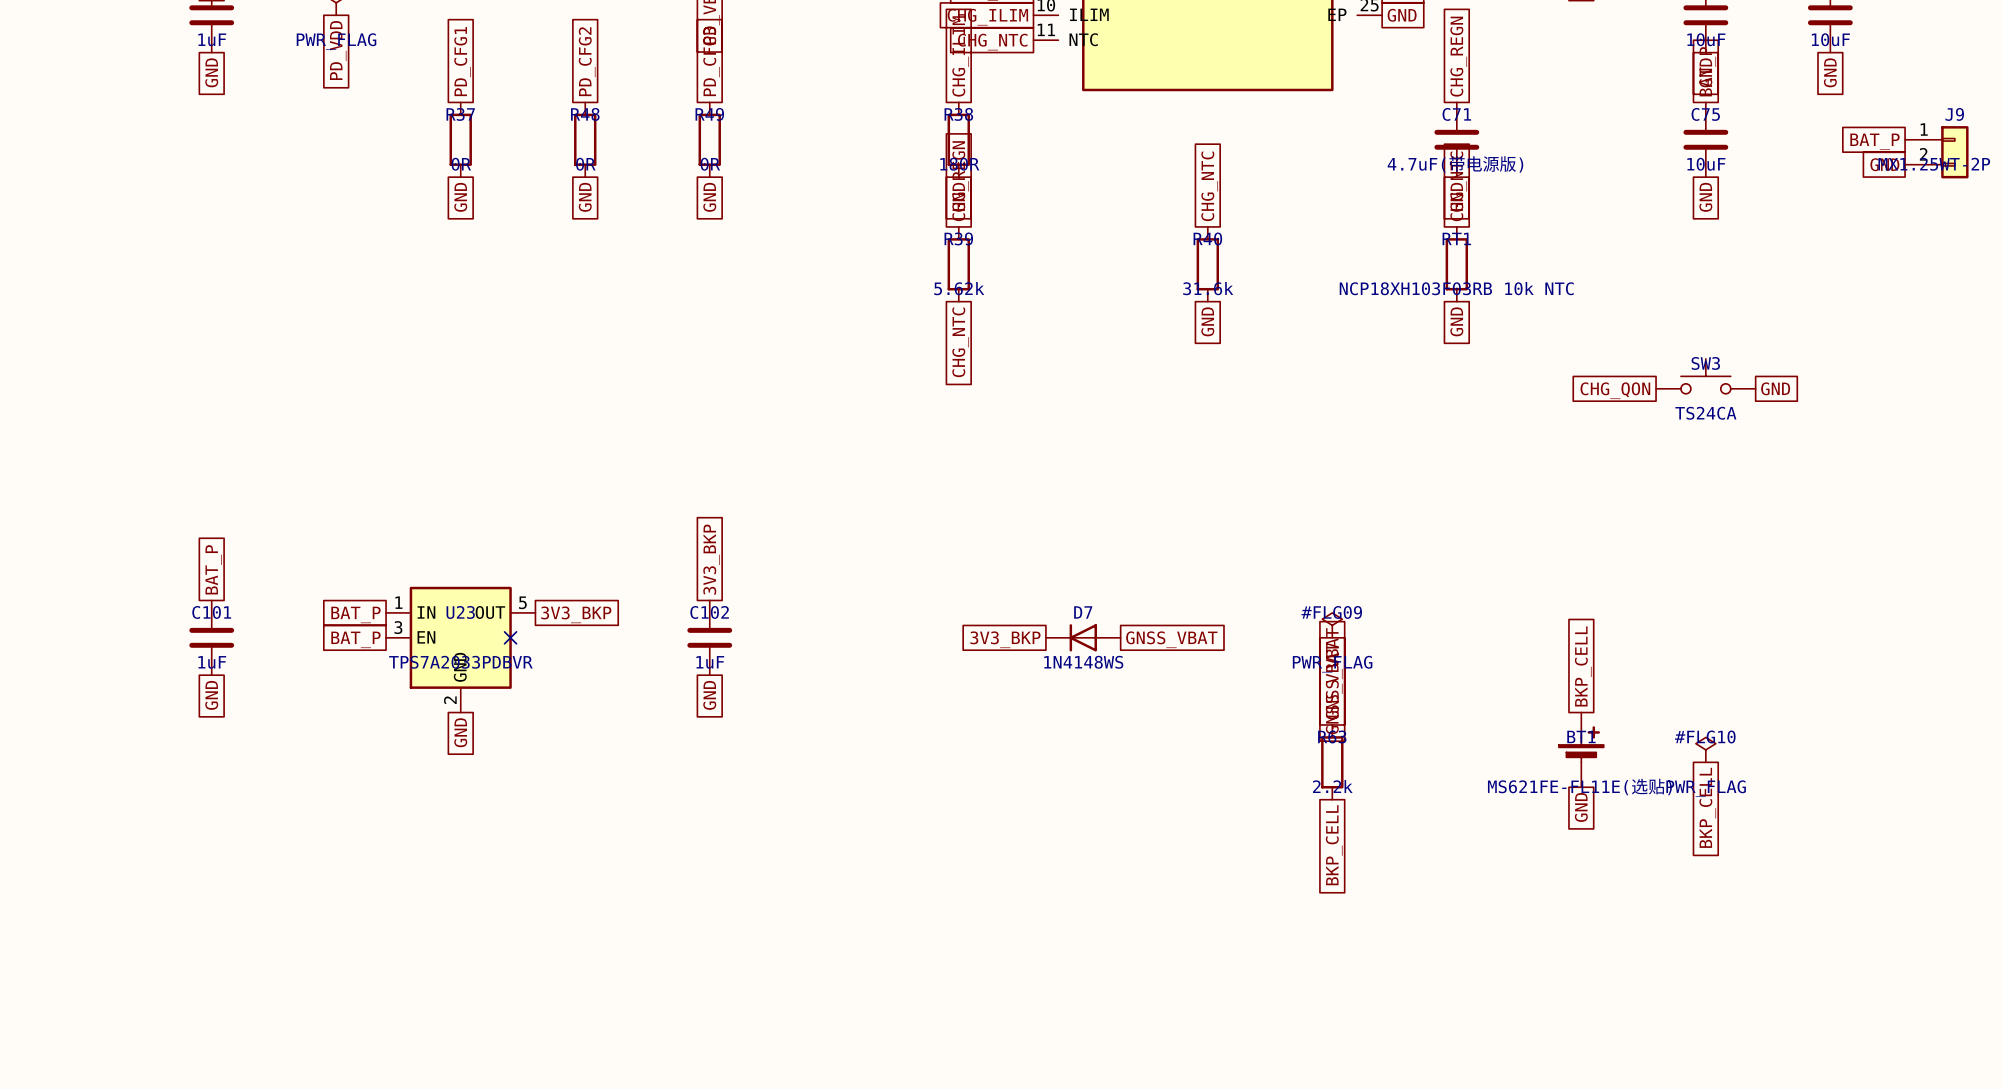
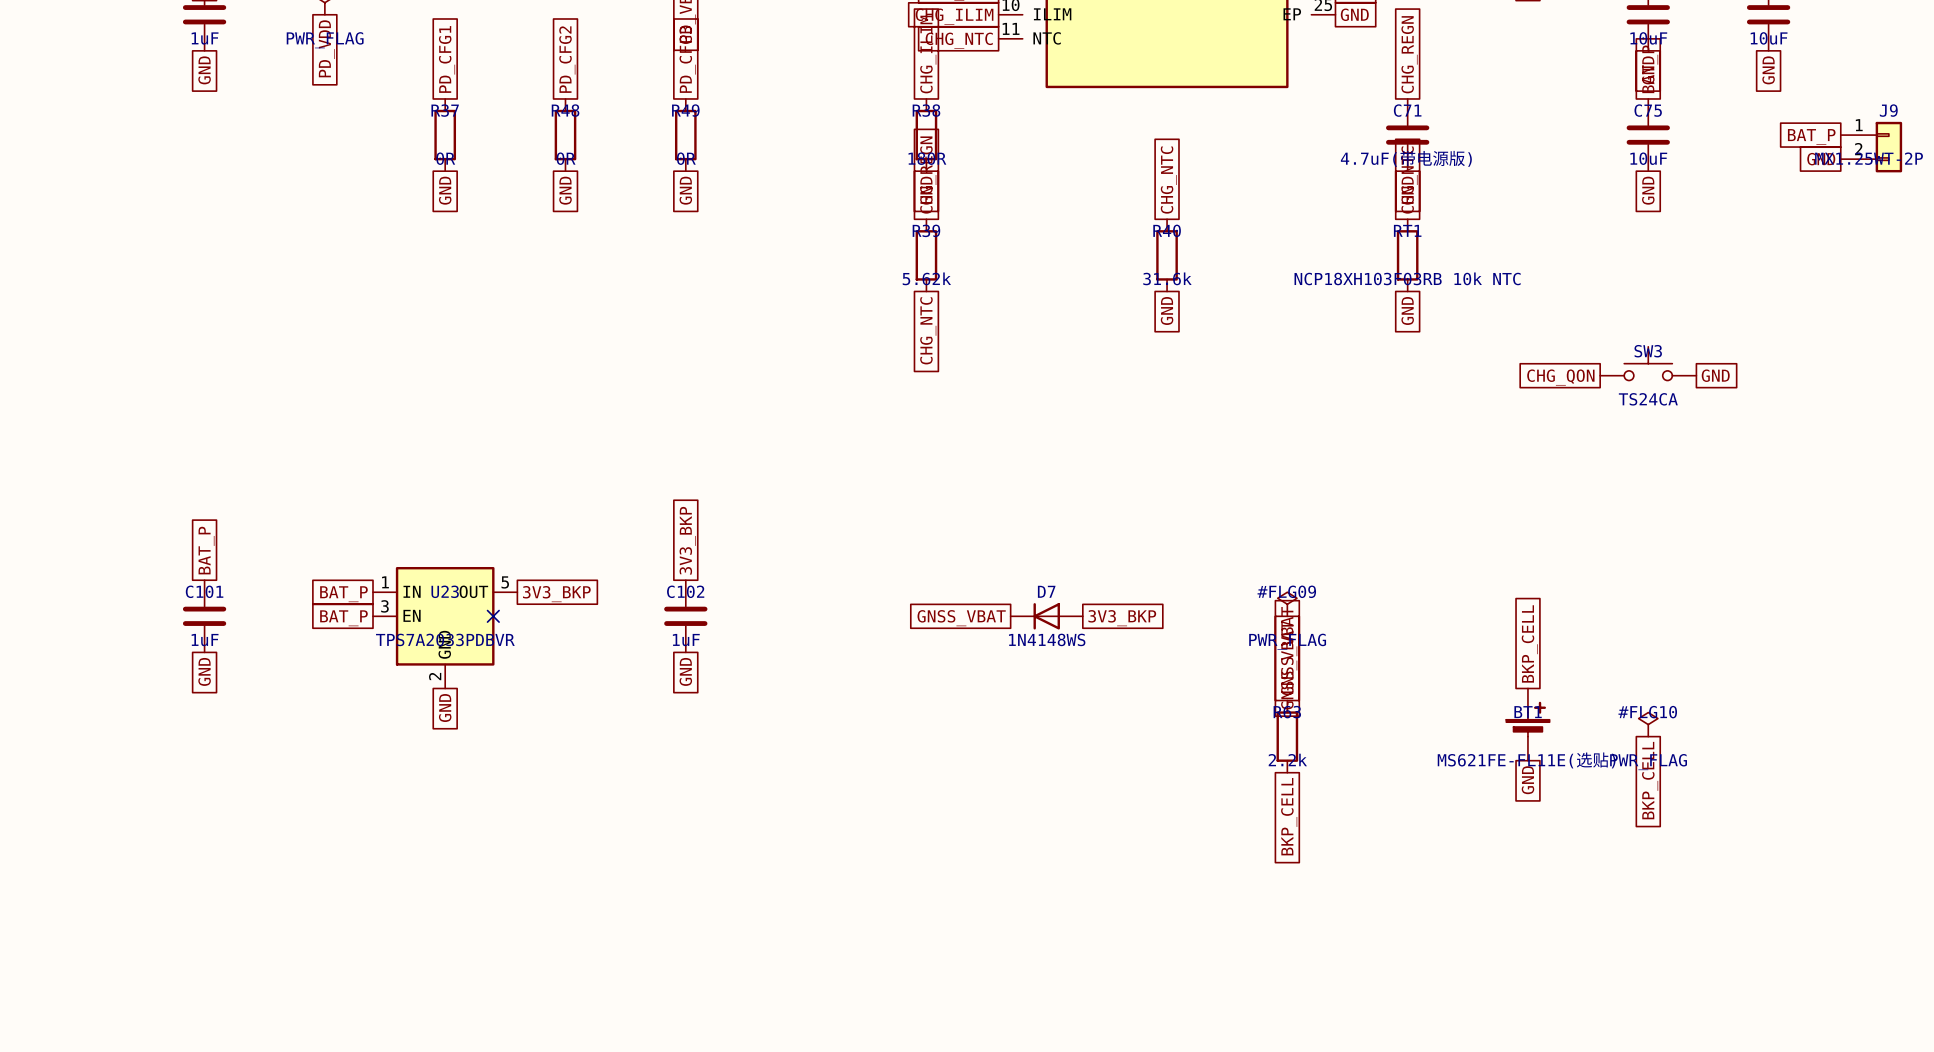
global label: 3V3_BKP (1005, 639) -> GNSS_VBAT (961, 618)
global label: GNSS_VBAT (1171, 639) -> 3V3_BKP (1122, 618)

